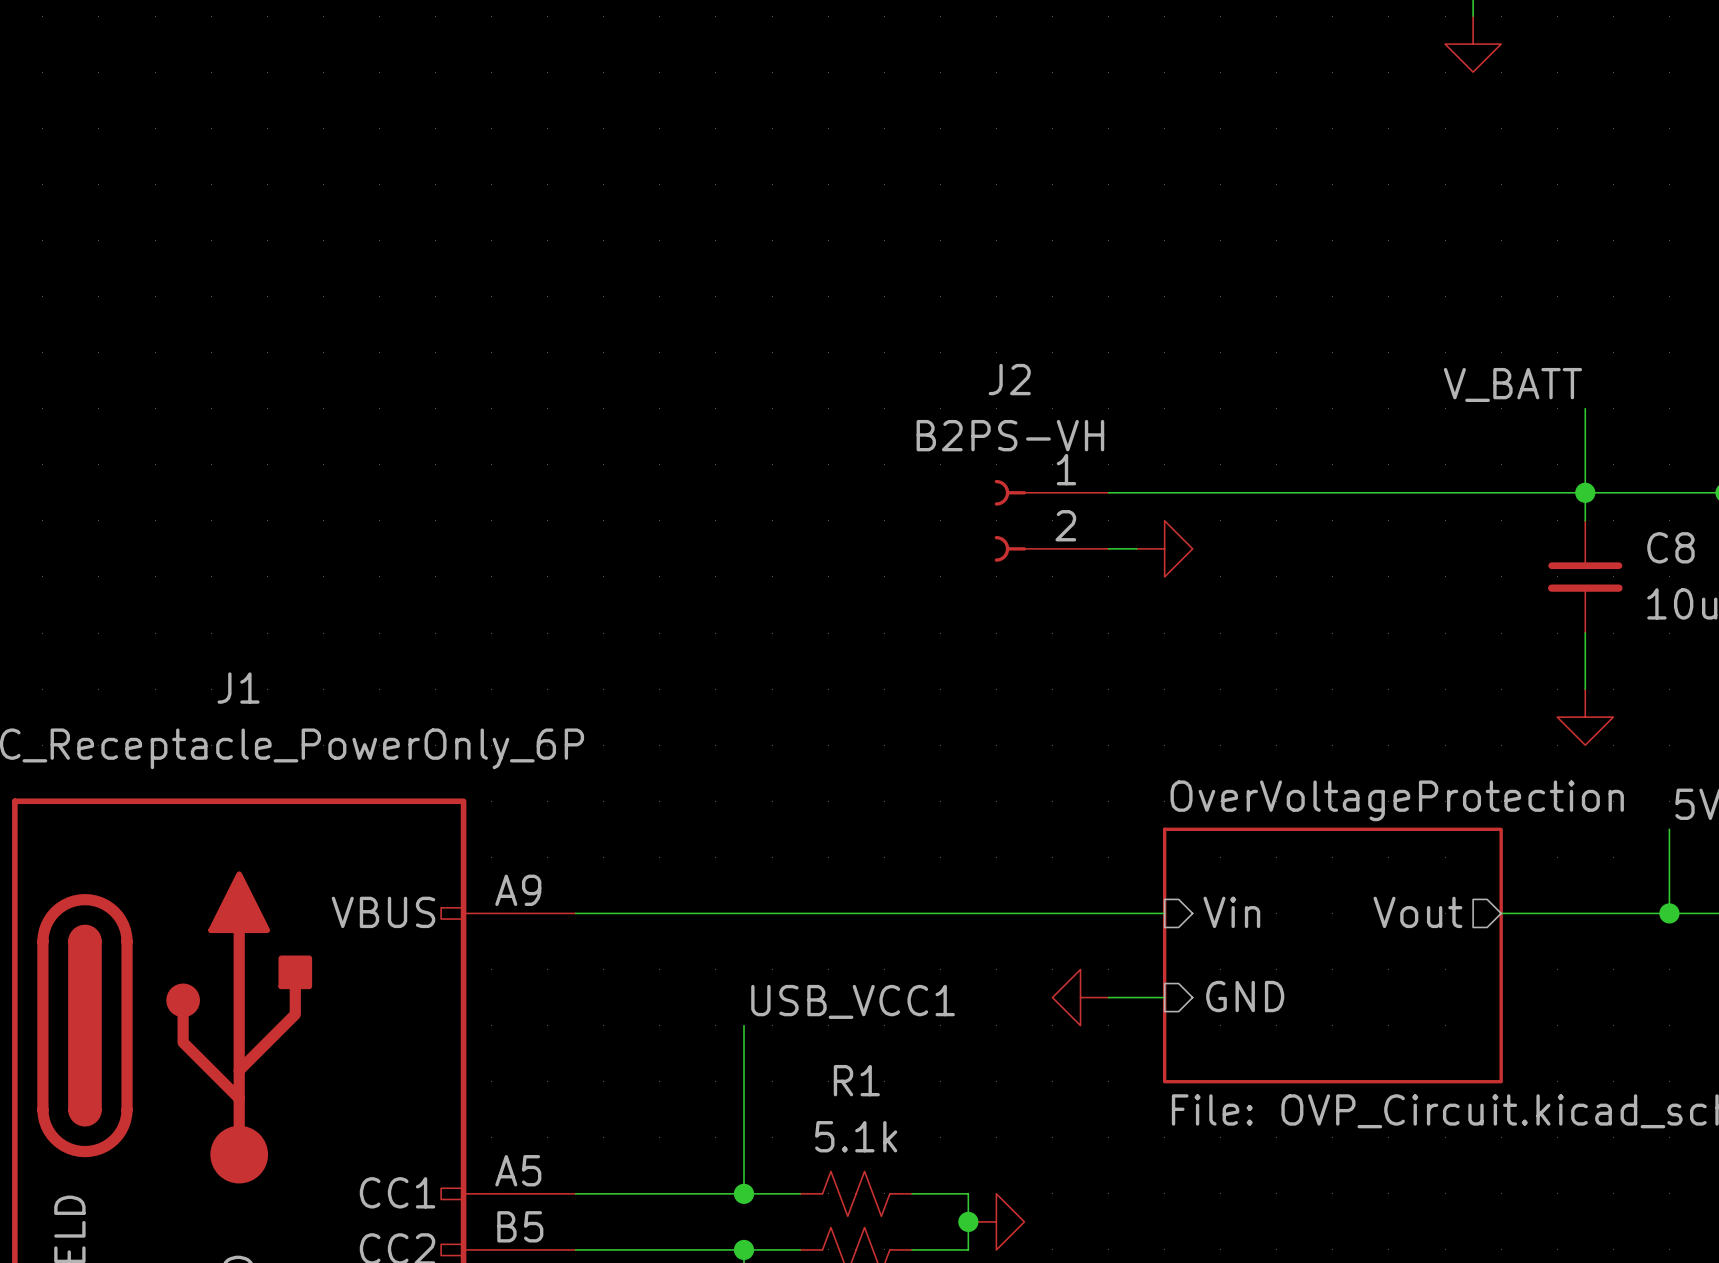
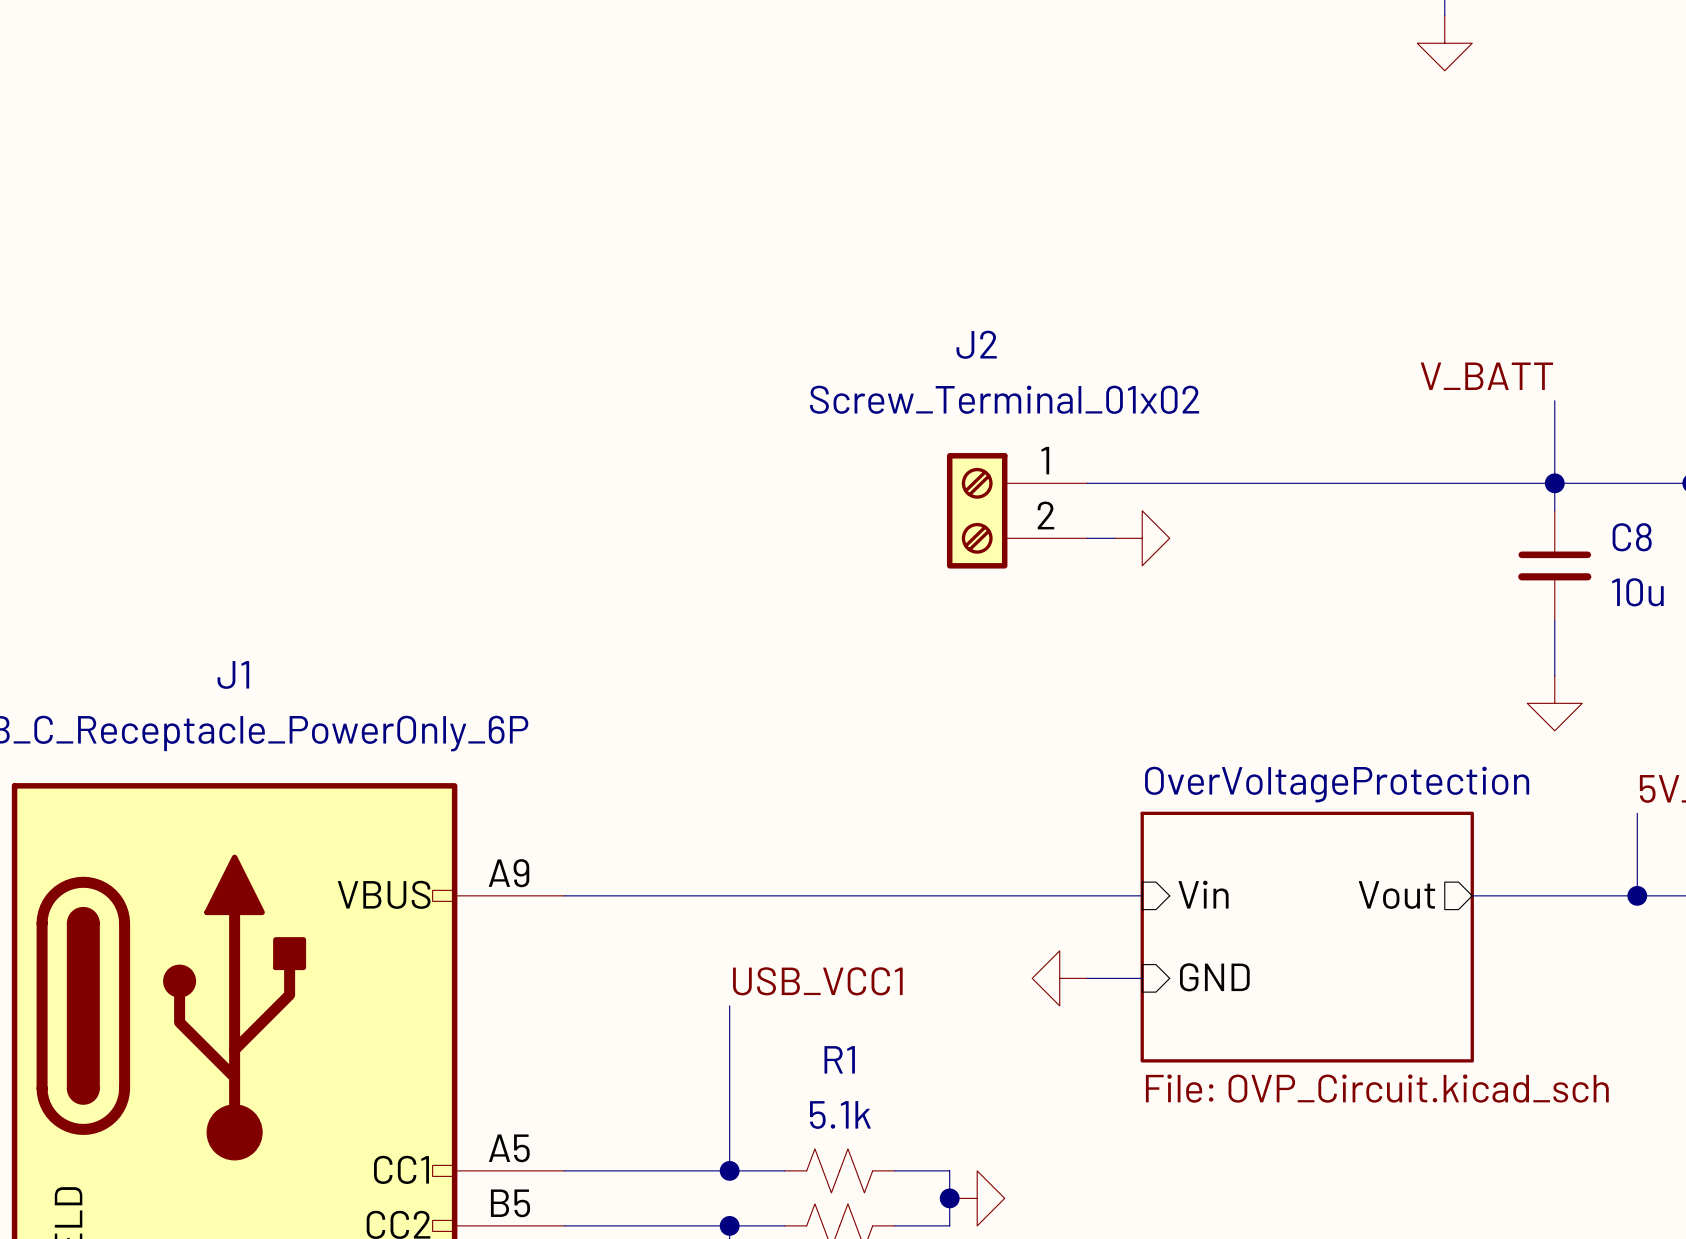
J2 value: B2PS-VH (1010, 435) -> Screw_Terminal_01x02 (1004, 399)
J2 symbol: [994, 479, 1109, 562] -> [946, 453, 1088, 569]

